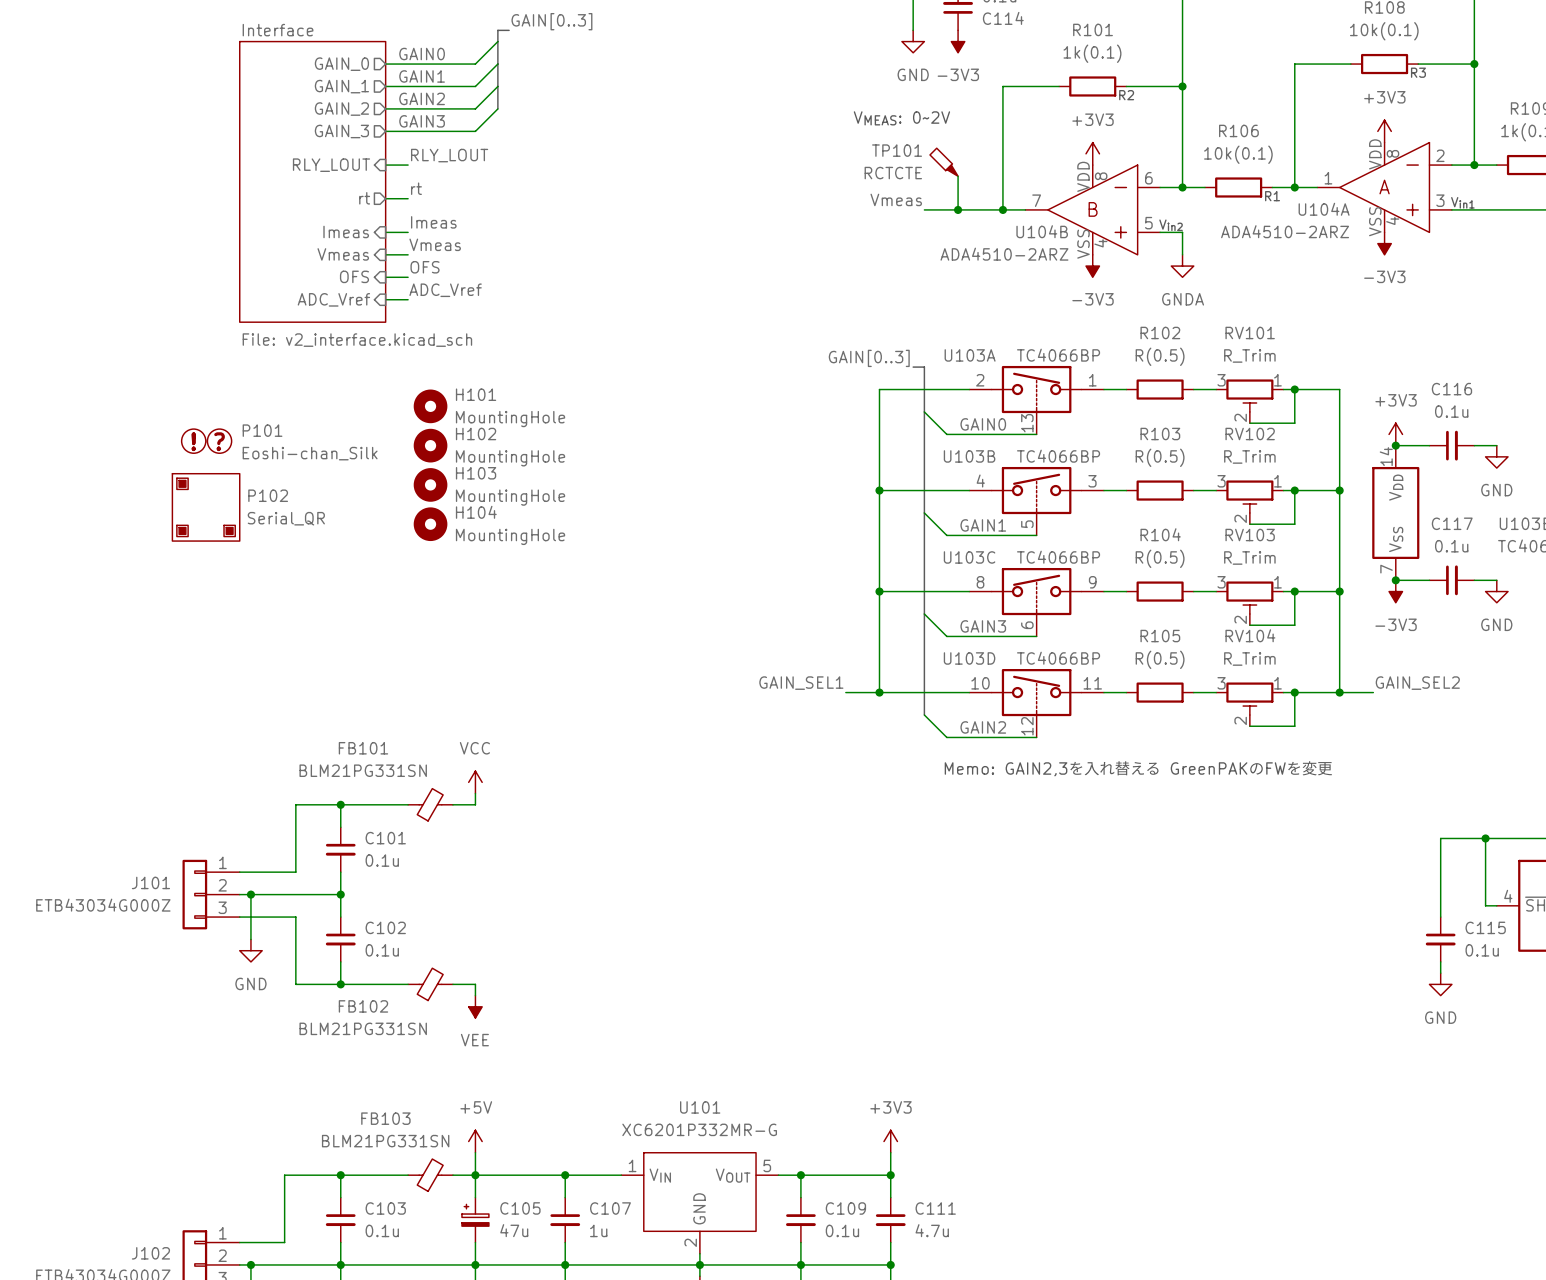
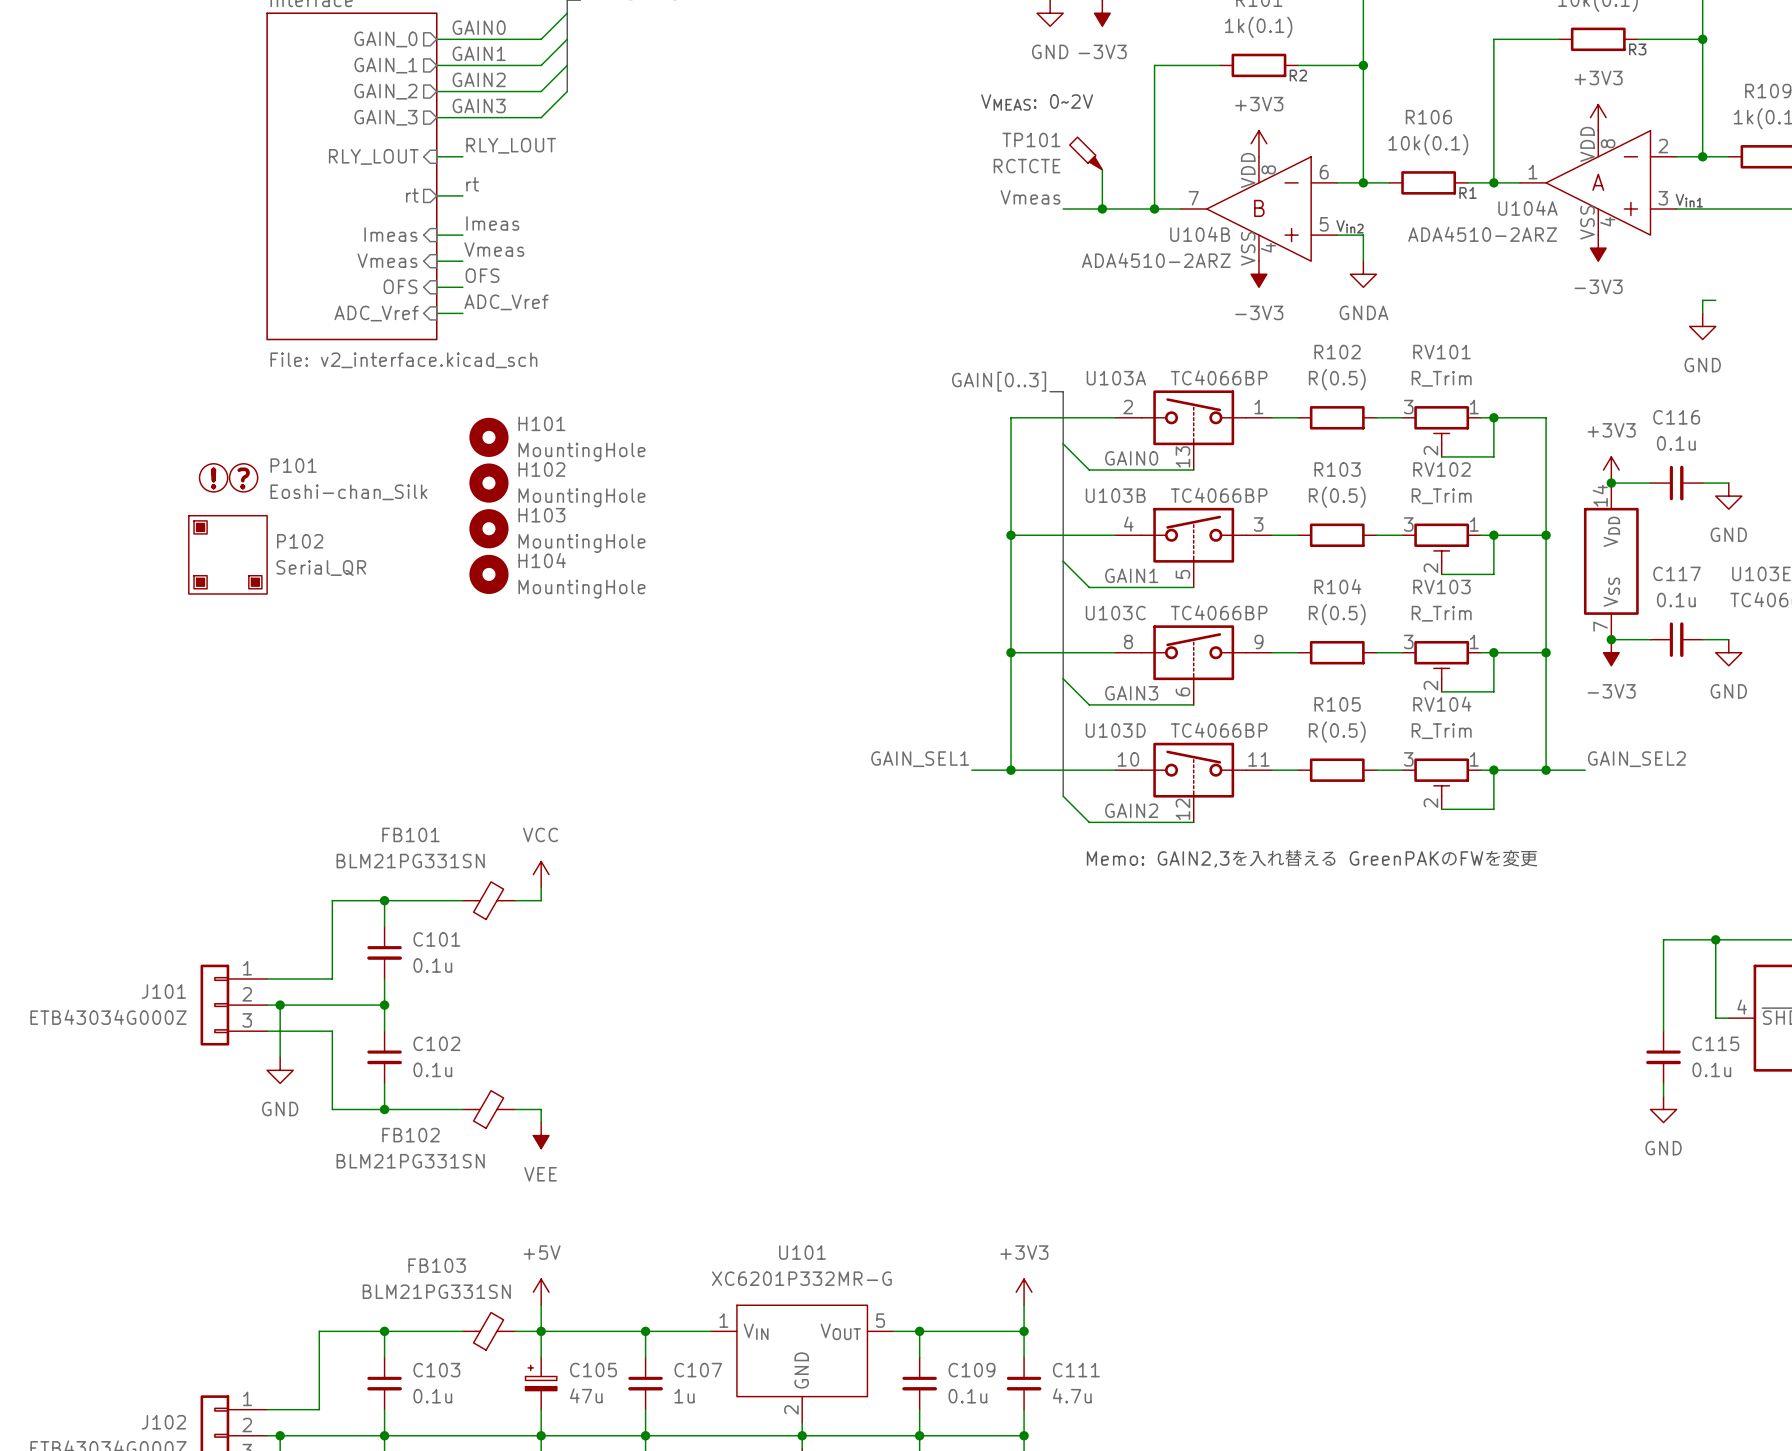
wire: none -> (1715, 300) (1702, 300) (1702, 313)
power symbol: none -> GND (1702, 326)

